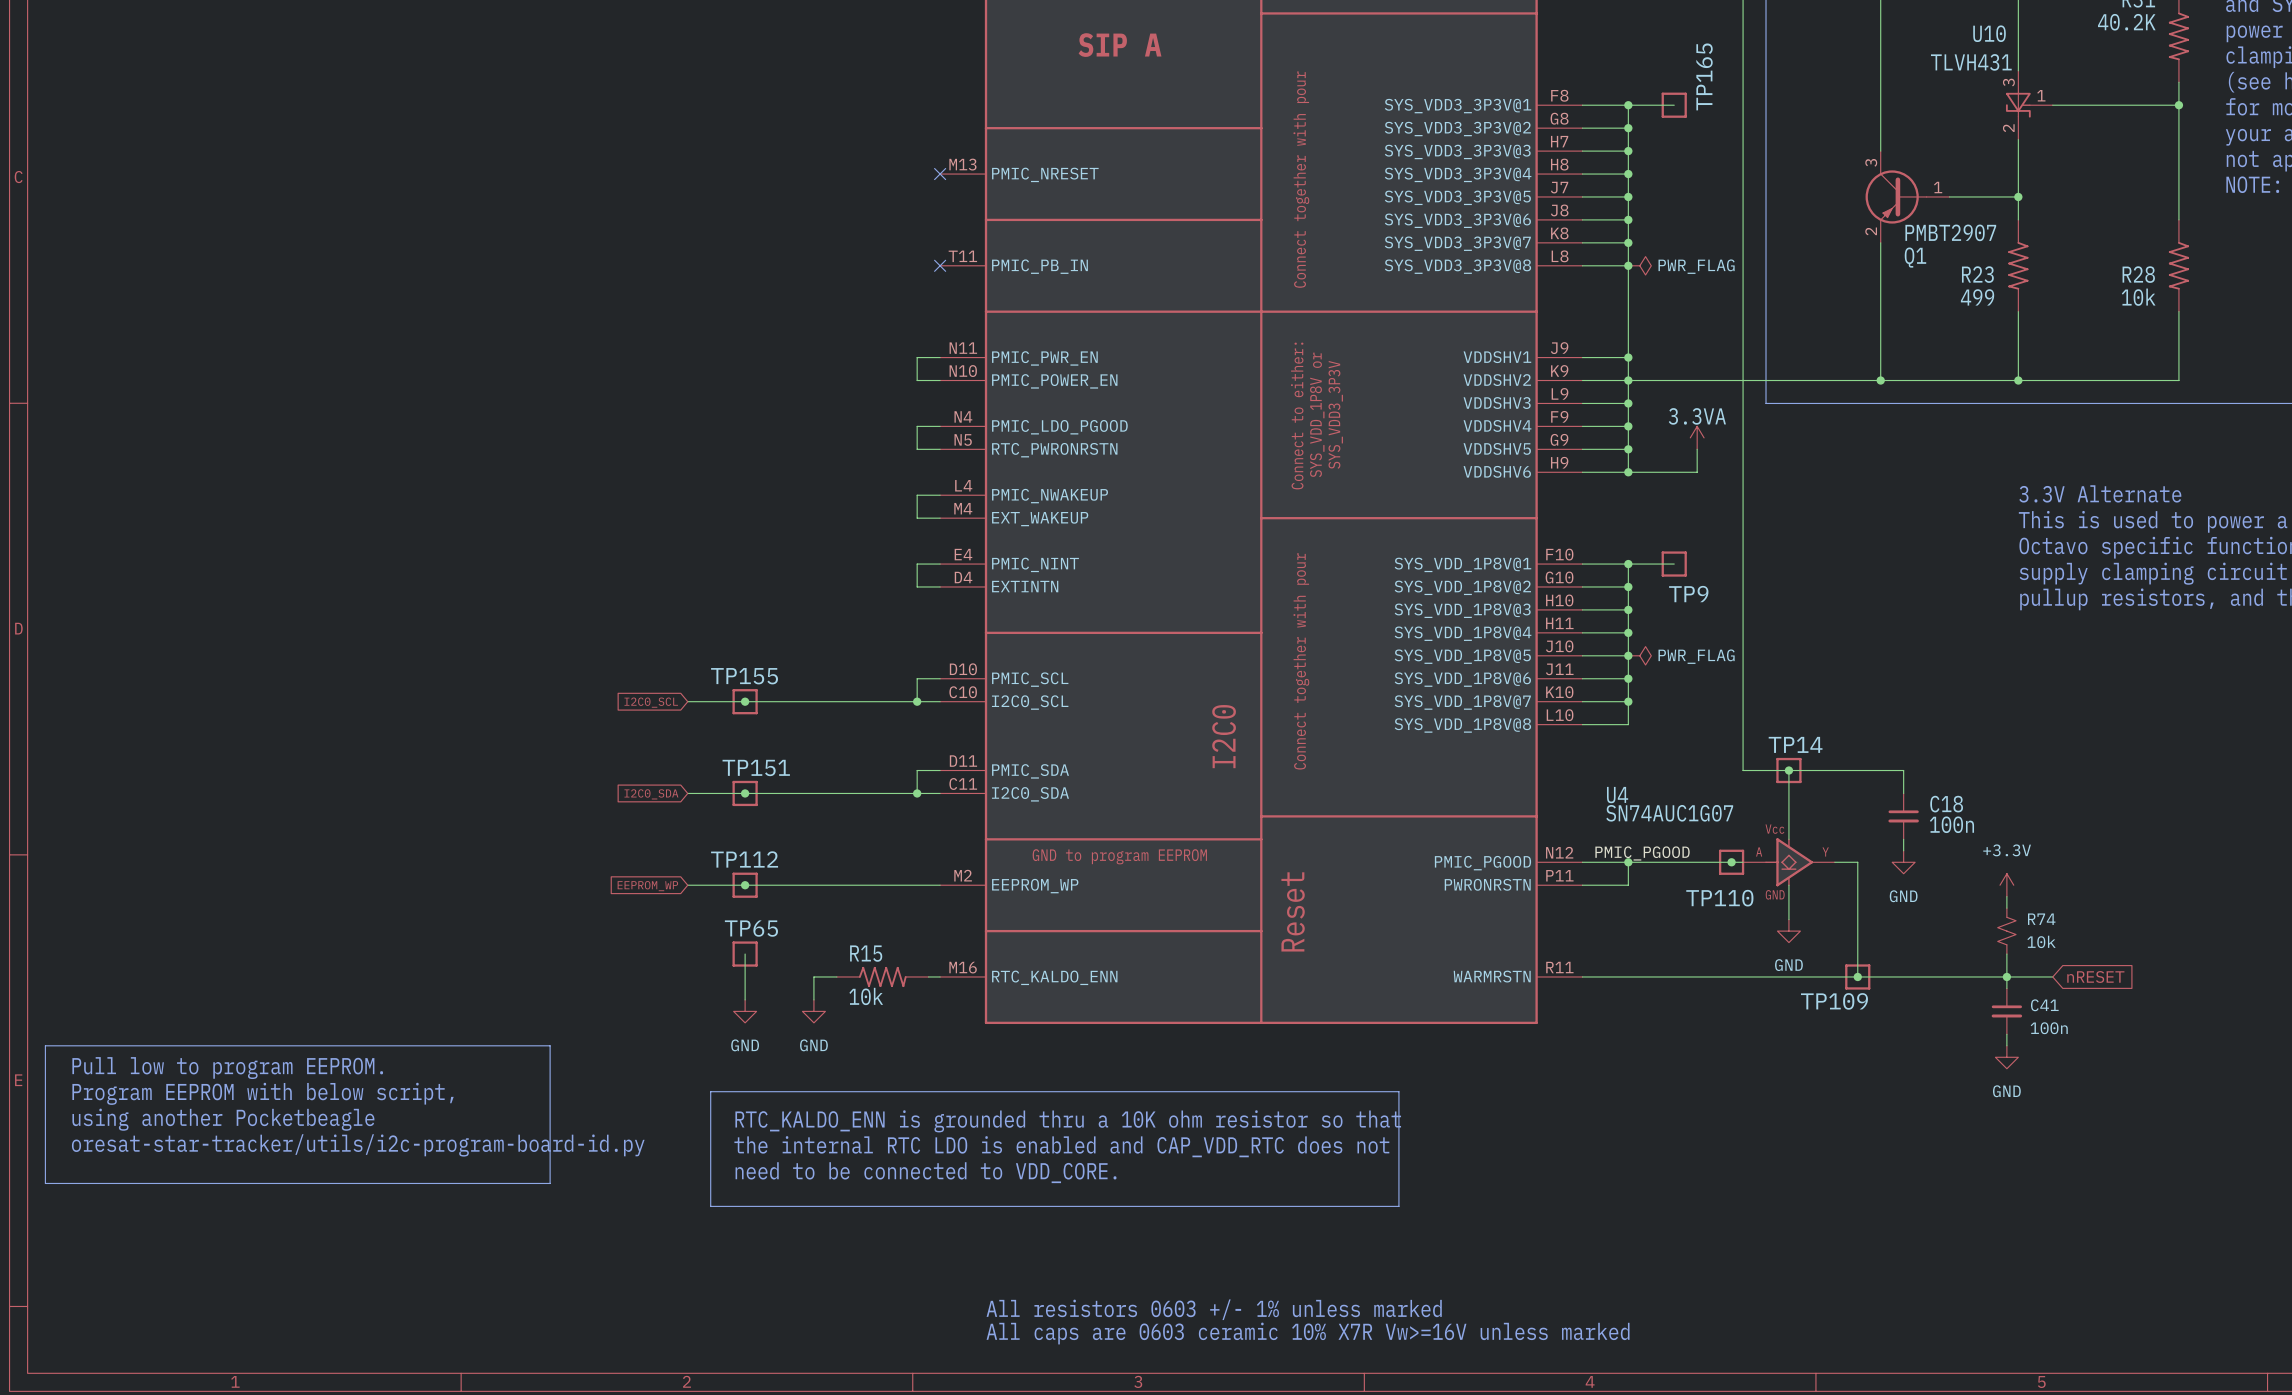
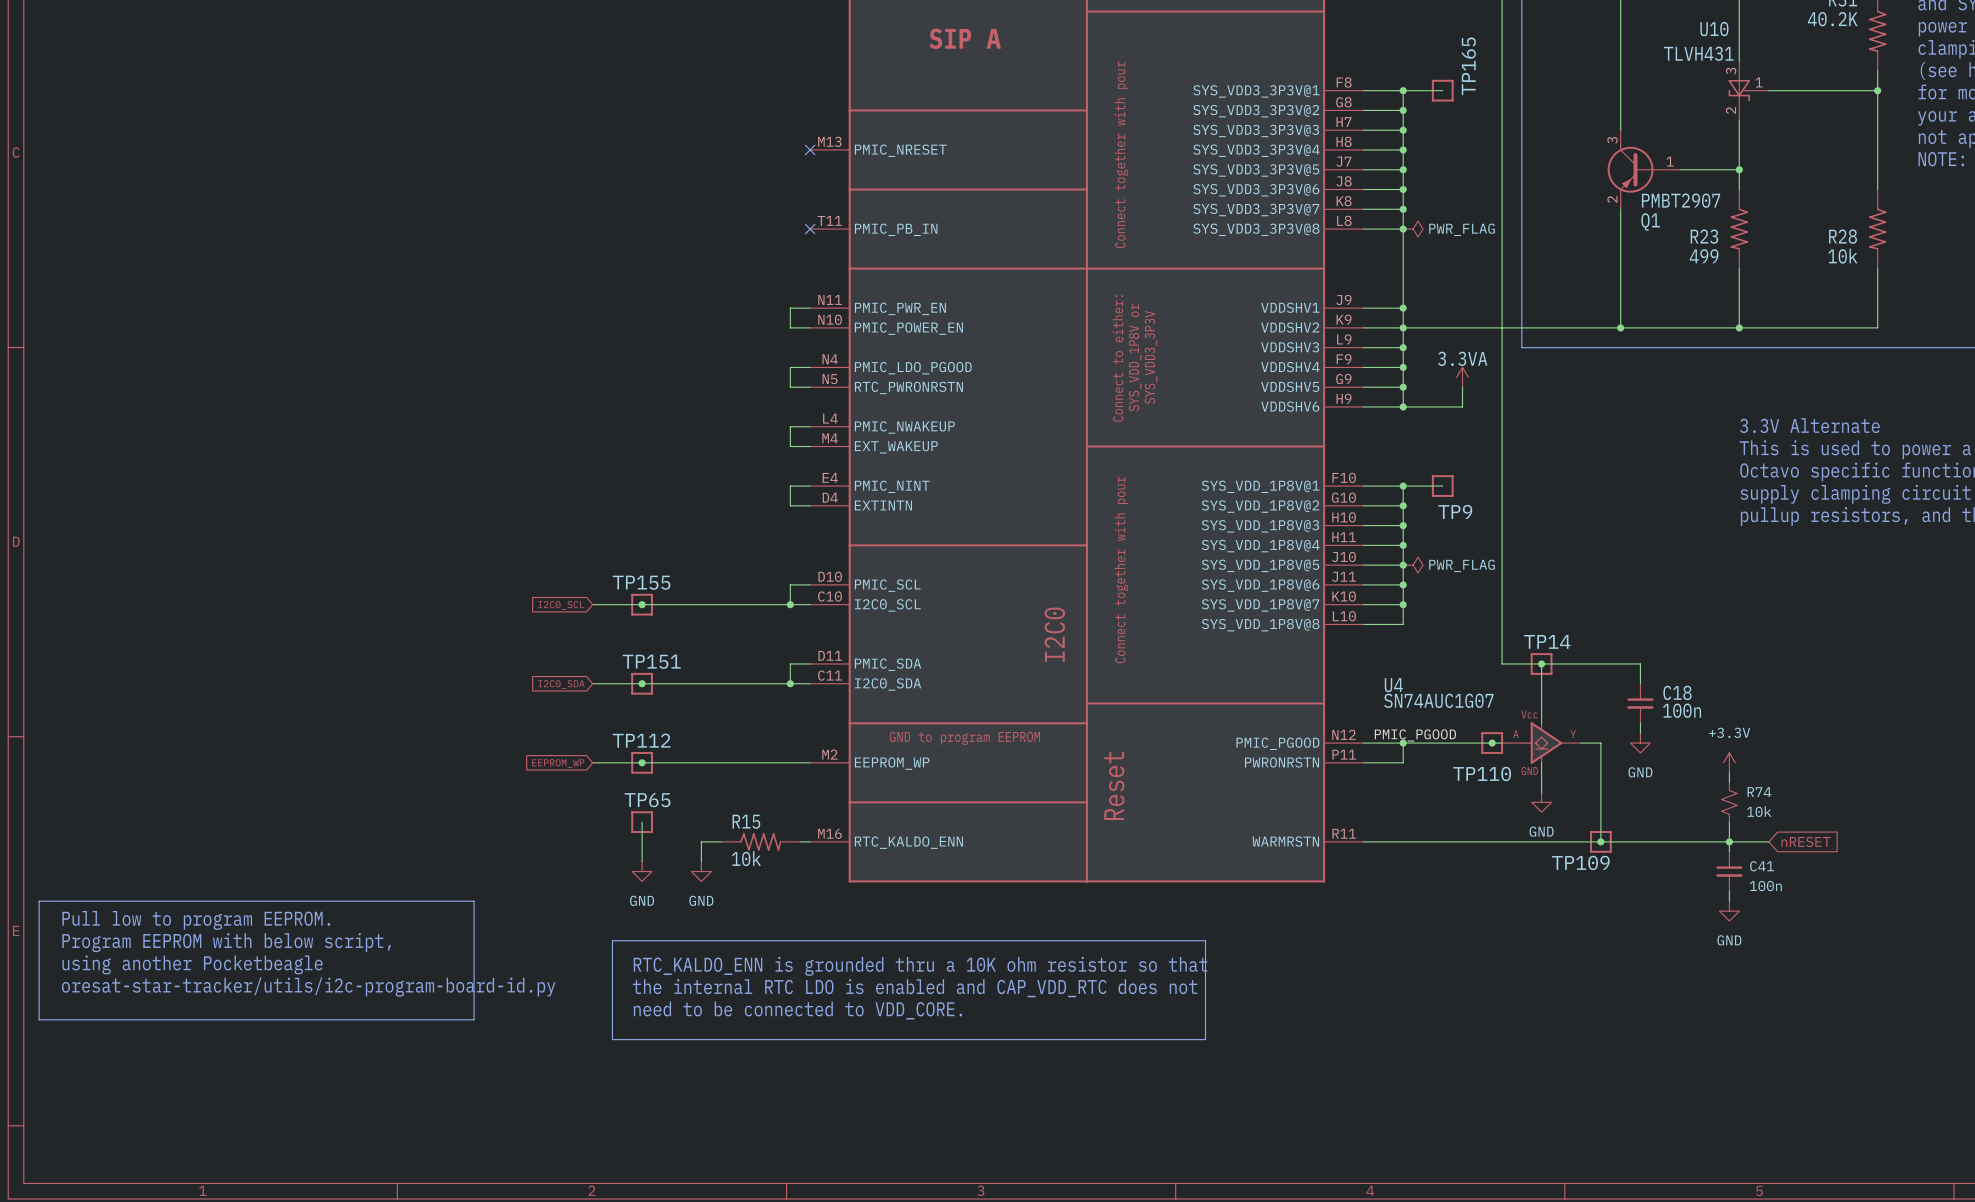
text: All resistors 0603 +/- 1% unless marked (1214, 1309) -> none
text: All caps are 0603 ceramic 10% X7R Vw>=16V unless marked (1308, 1333) -> none

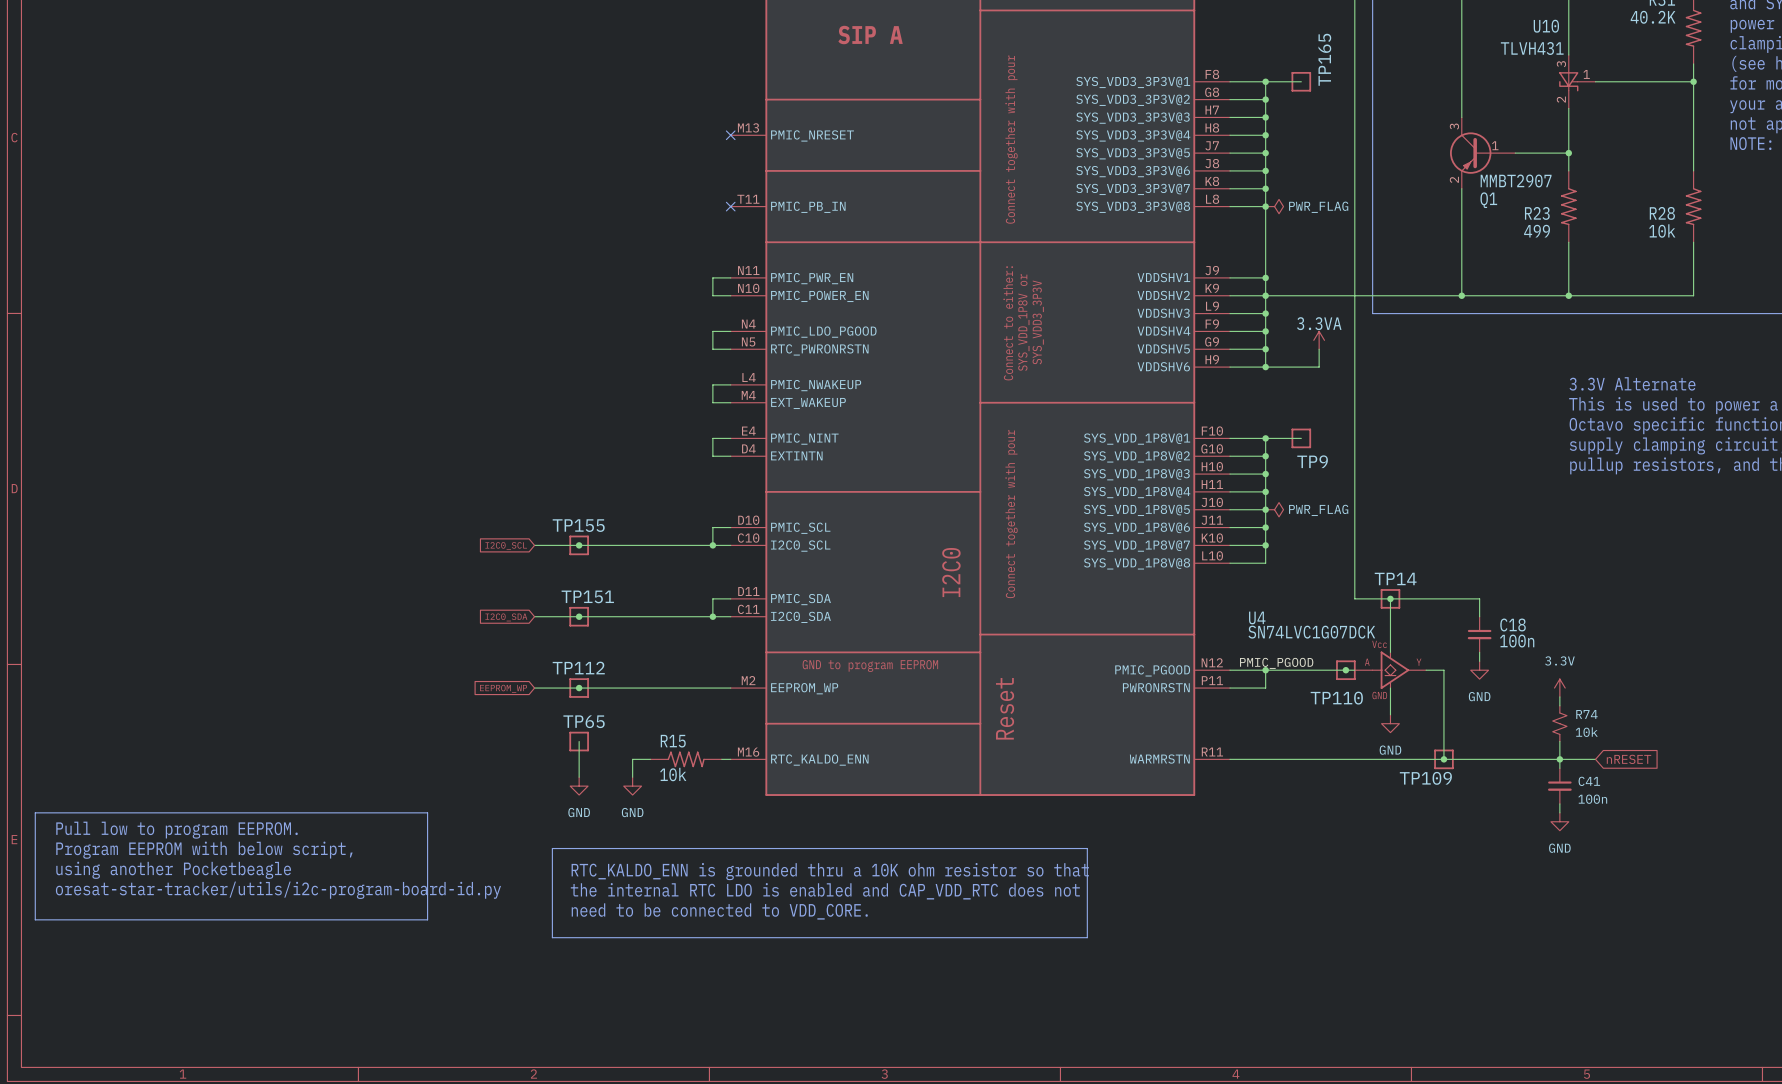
Q1 symbol: [1607, 130, 1680, 210] -> [1450, 117, 1516, 189]
Q1 value: PMBT2907 (1681, 200) -> MMBT2907 (1516, 181)
U4 value: SN74AUC1G07 (1438, 700) -> SN74LVC1G07DCK (1311, 632)
U4 symbol: [1502, 722, 1582, 764] -> [1354, 651, 1427, 689]
power symbol: +3.3V (1729, 762) -> 3.3V (1559, 688)

